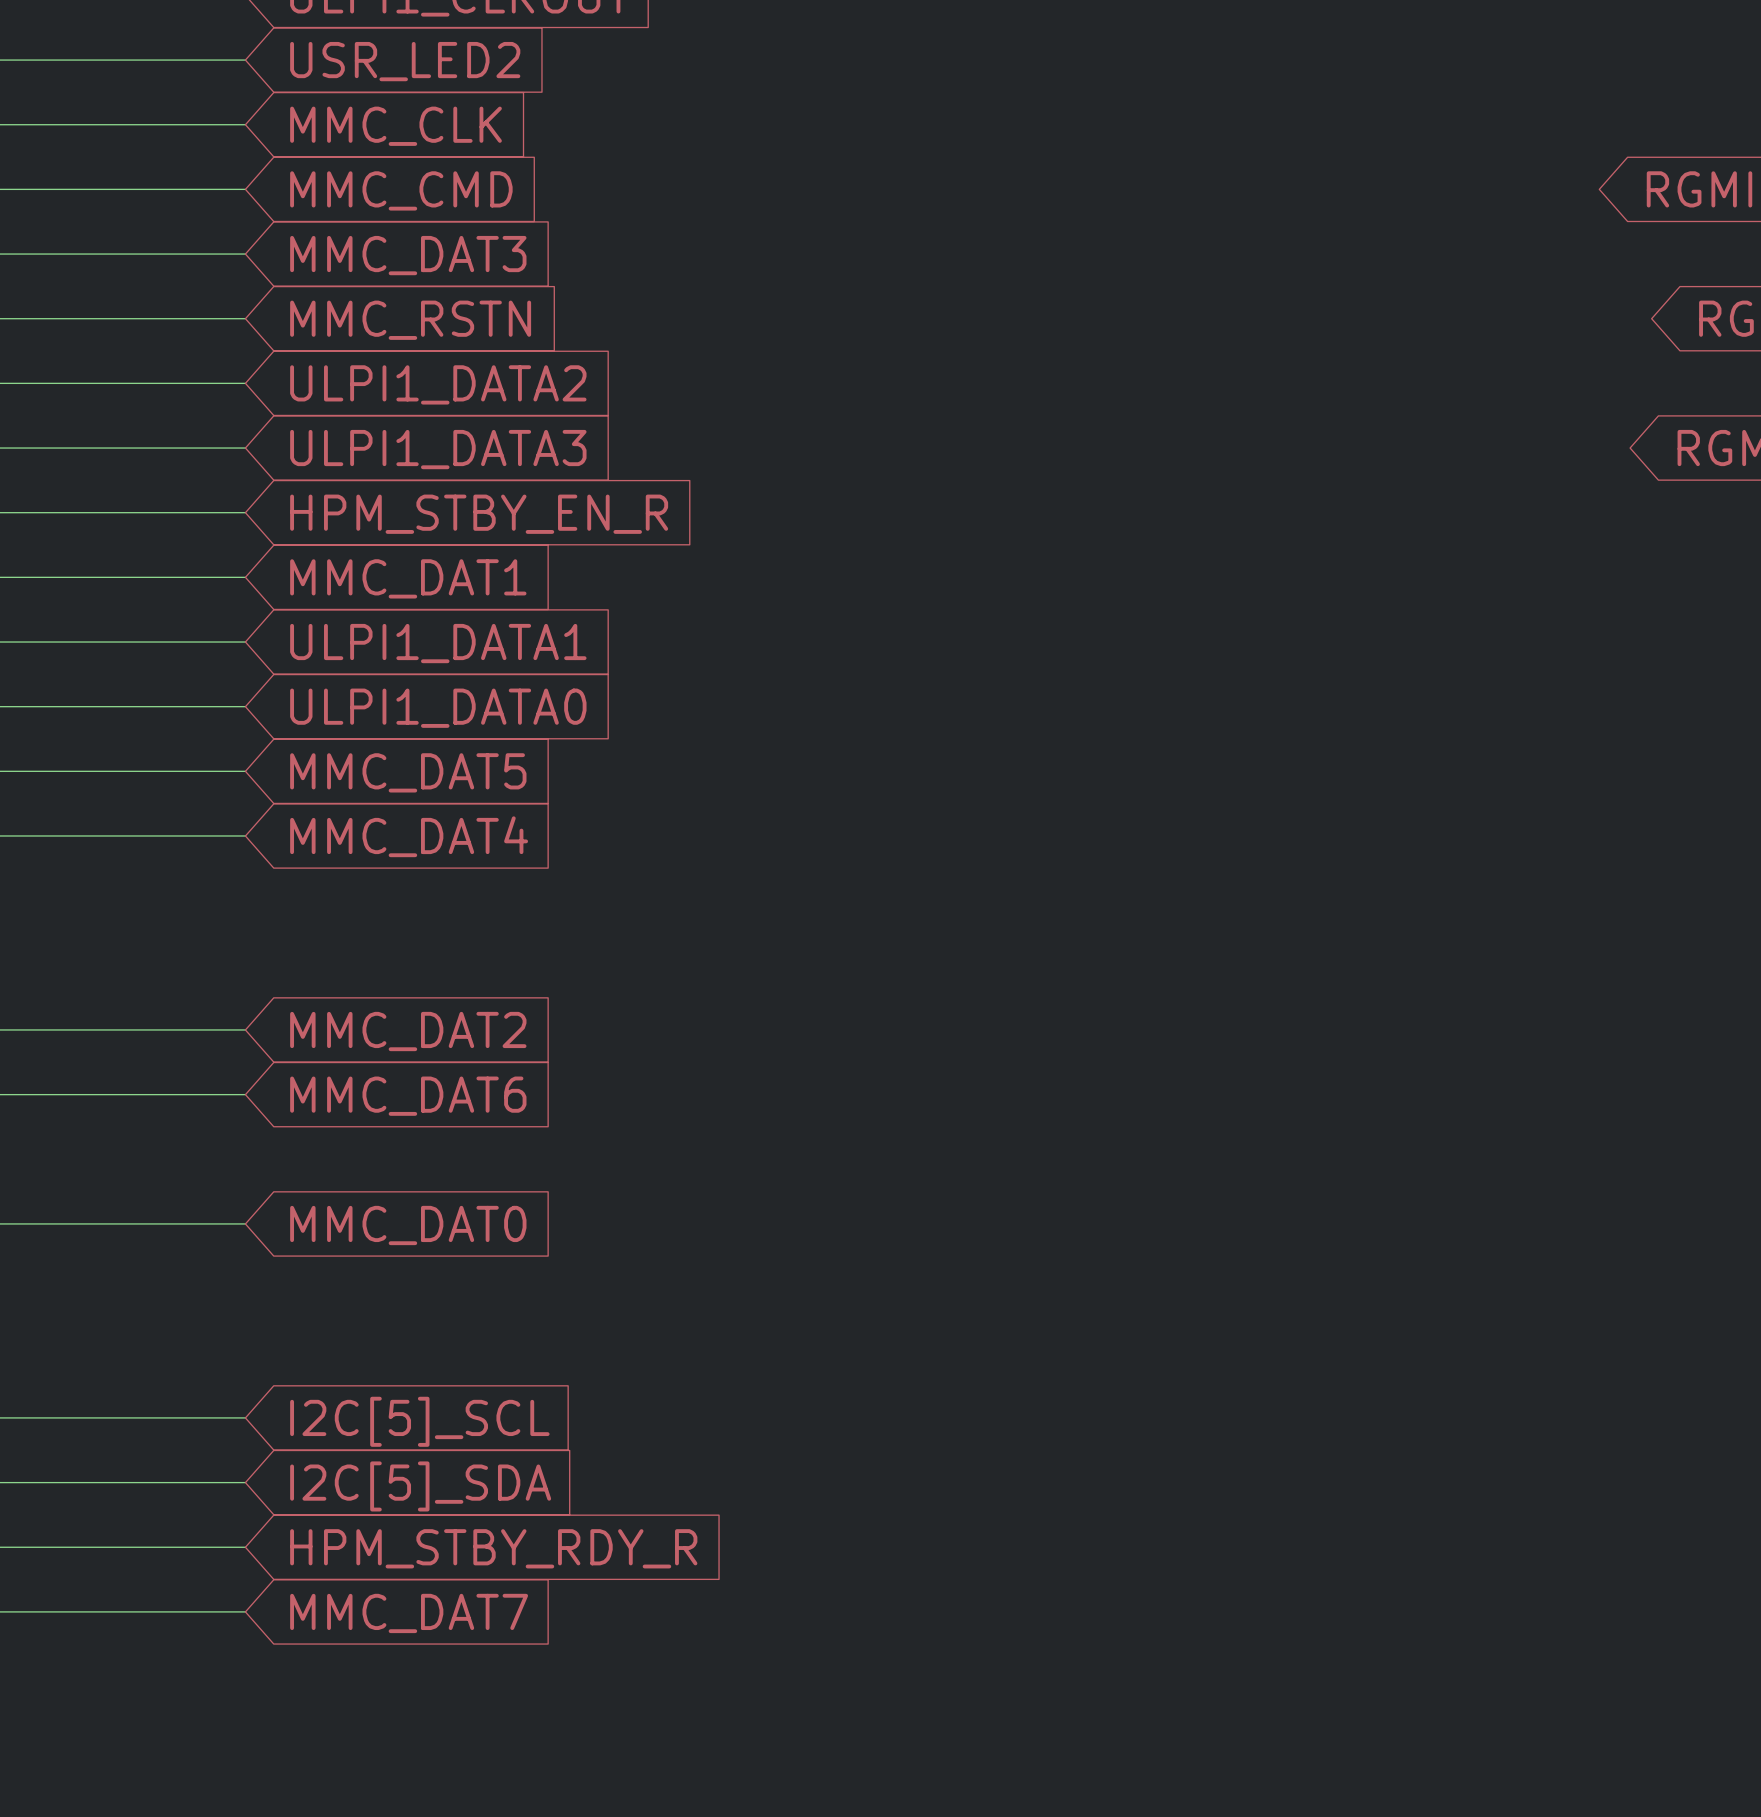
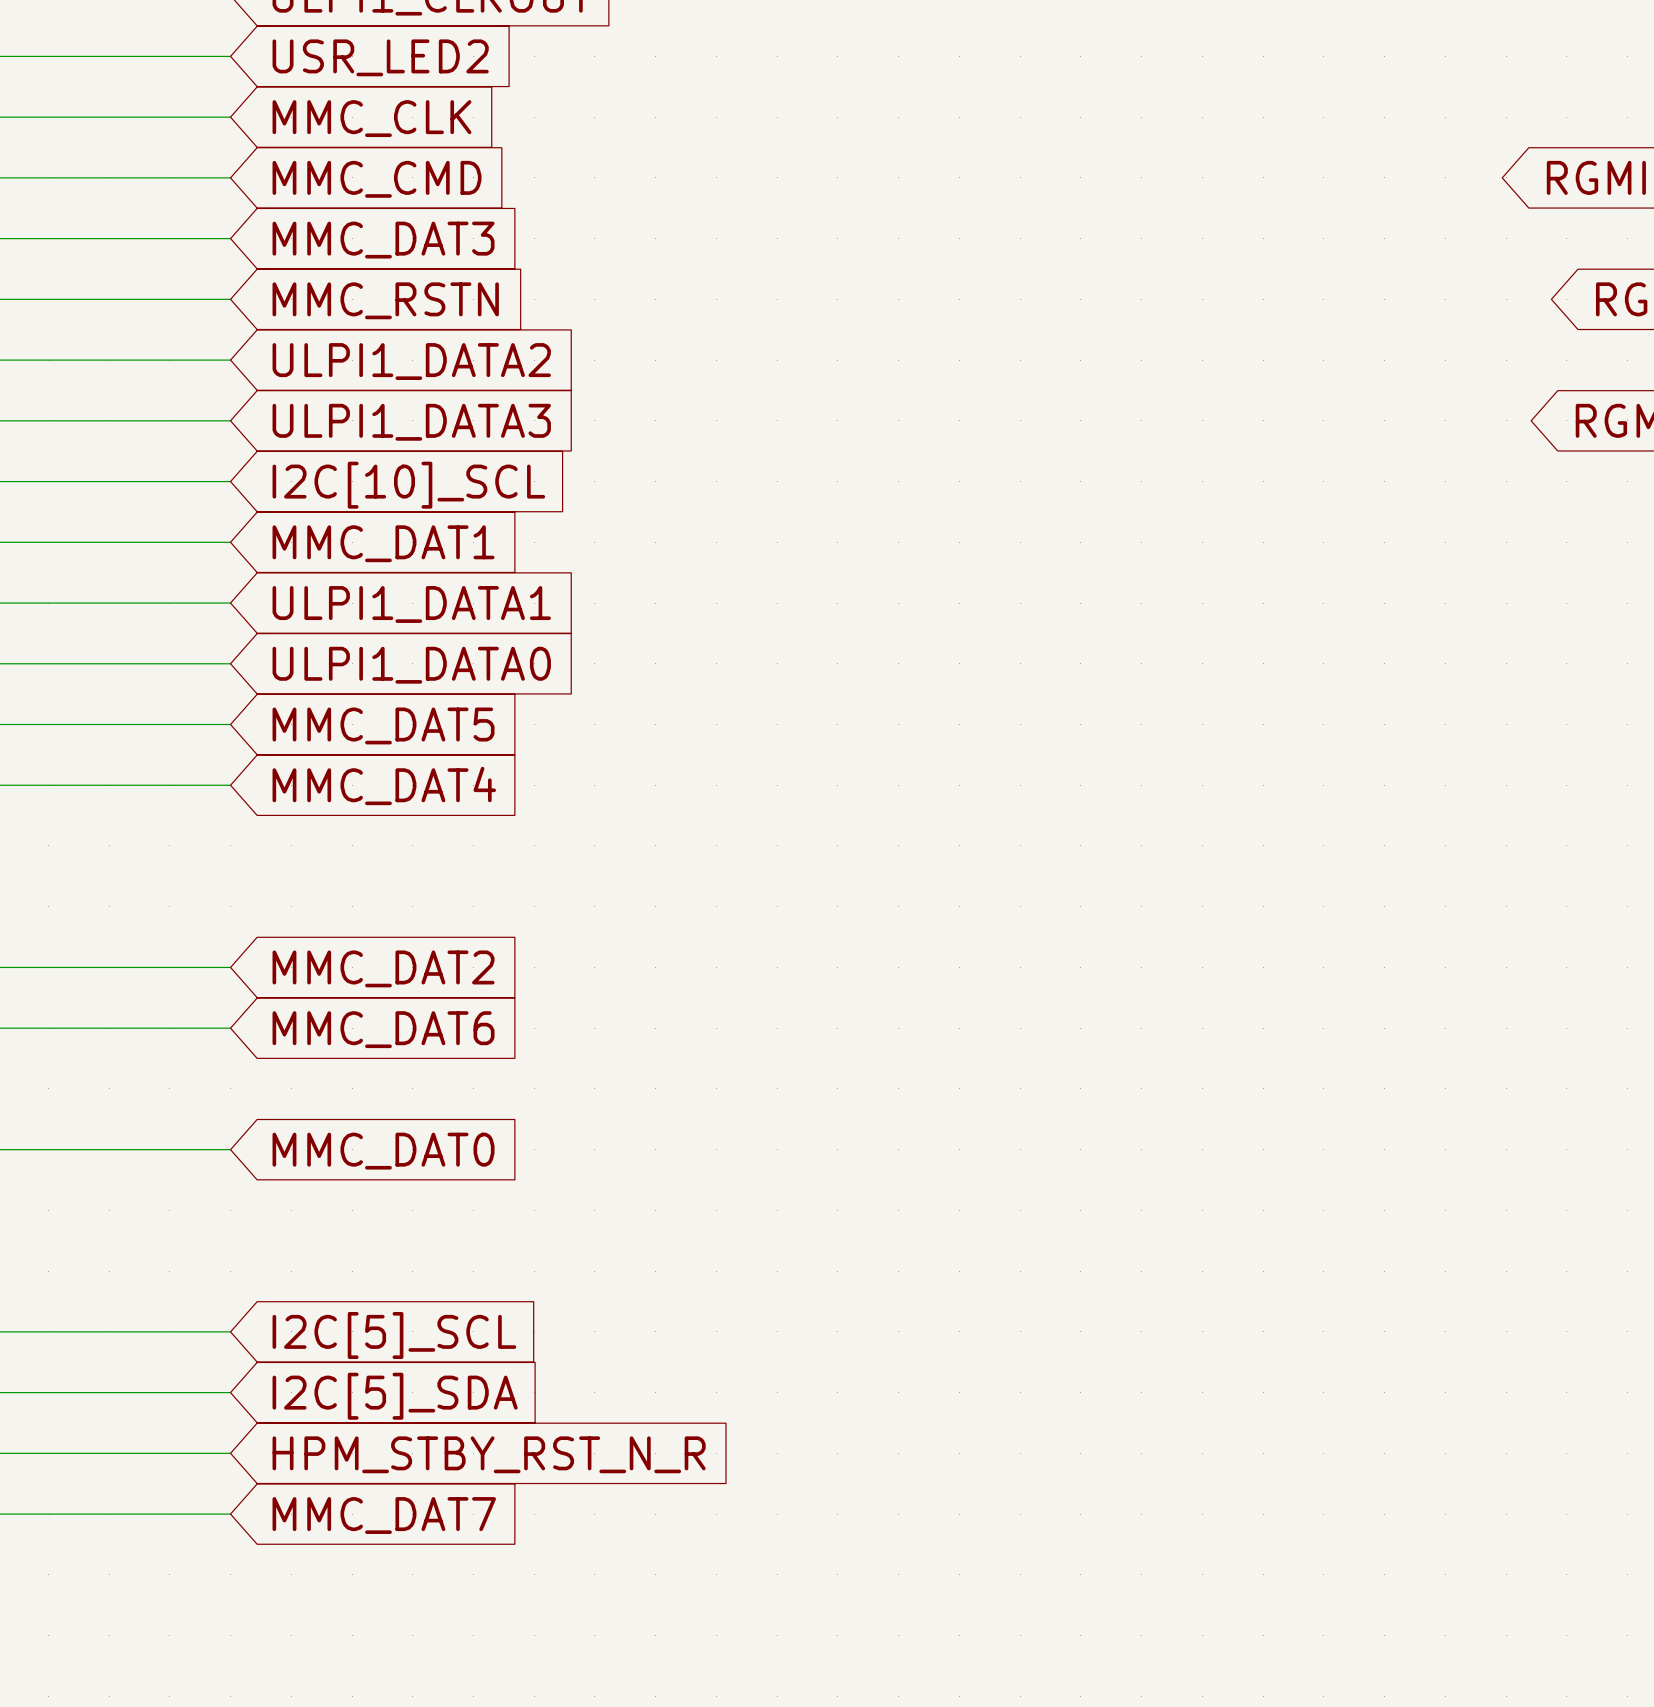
global label: HPM_STBY_EN_R (479, 514) -> I2C[10]_SCL (408, 485)
global label: HPM_STBY_RDY_R (493, 1548) -> HPM_STBY_RST_N_R (489, 1454)

